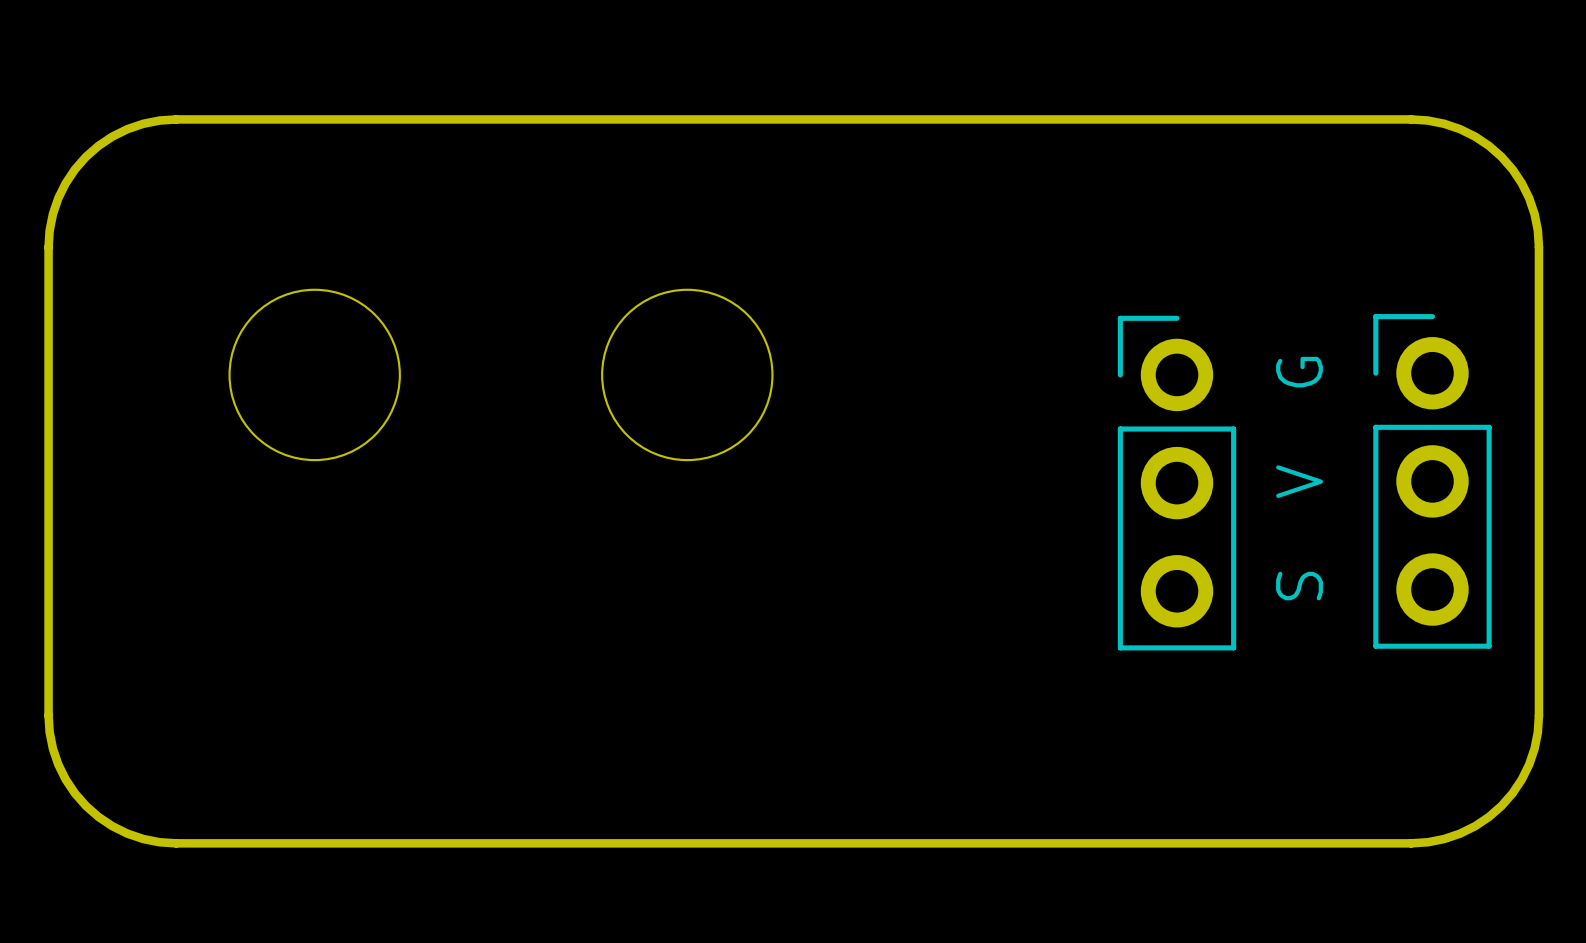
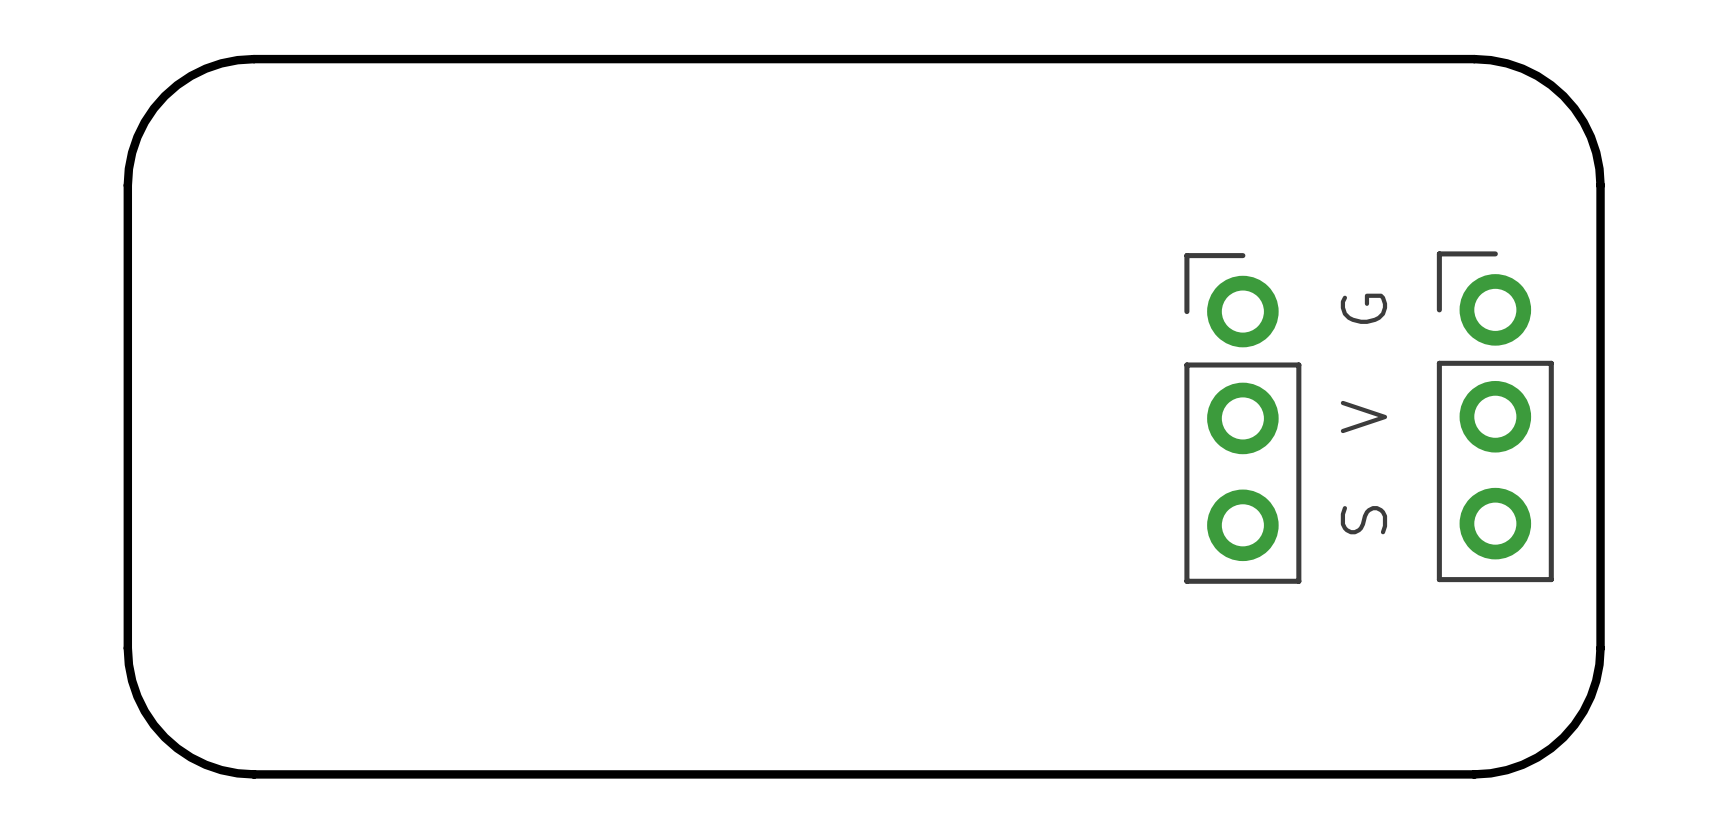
round board edge: [228, 288, 401, 462] -> none
round board edge: [601, 288, 774, 462] -> none

